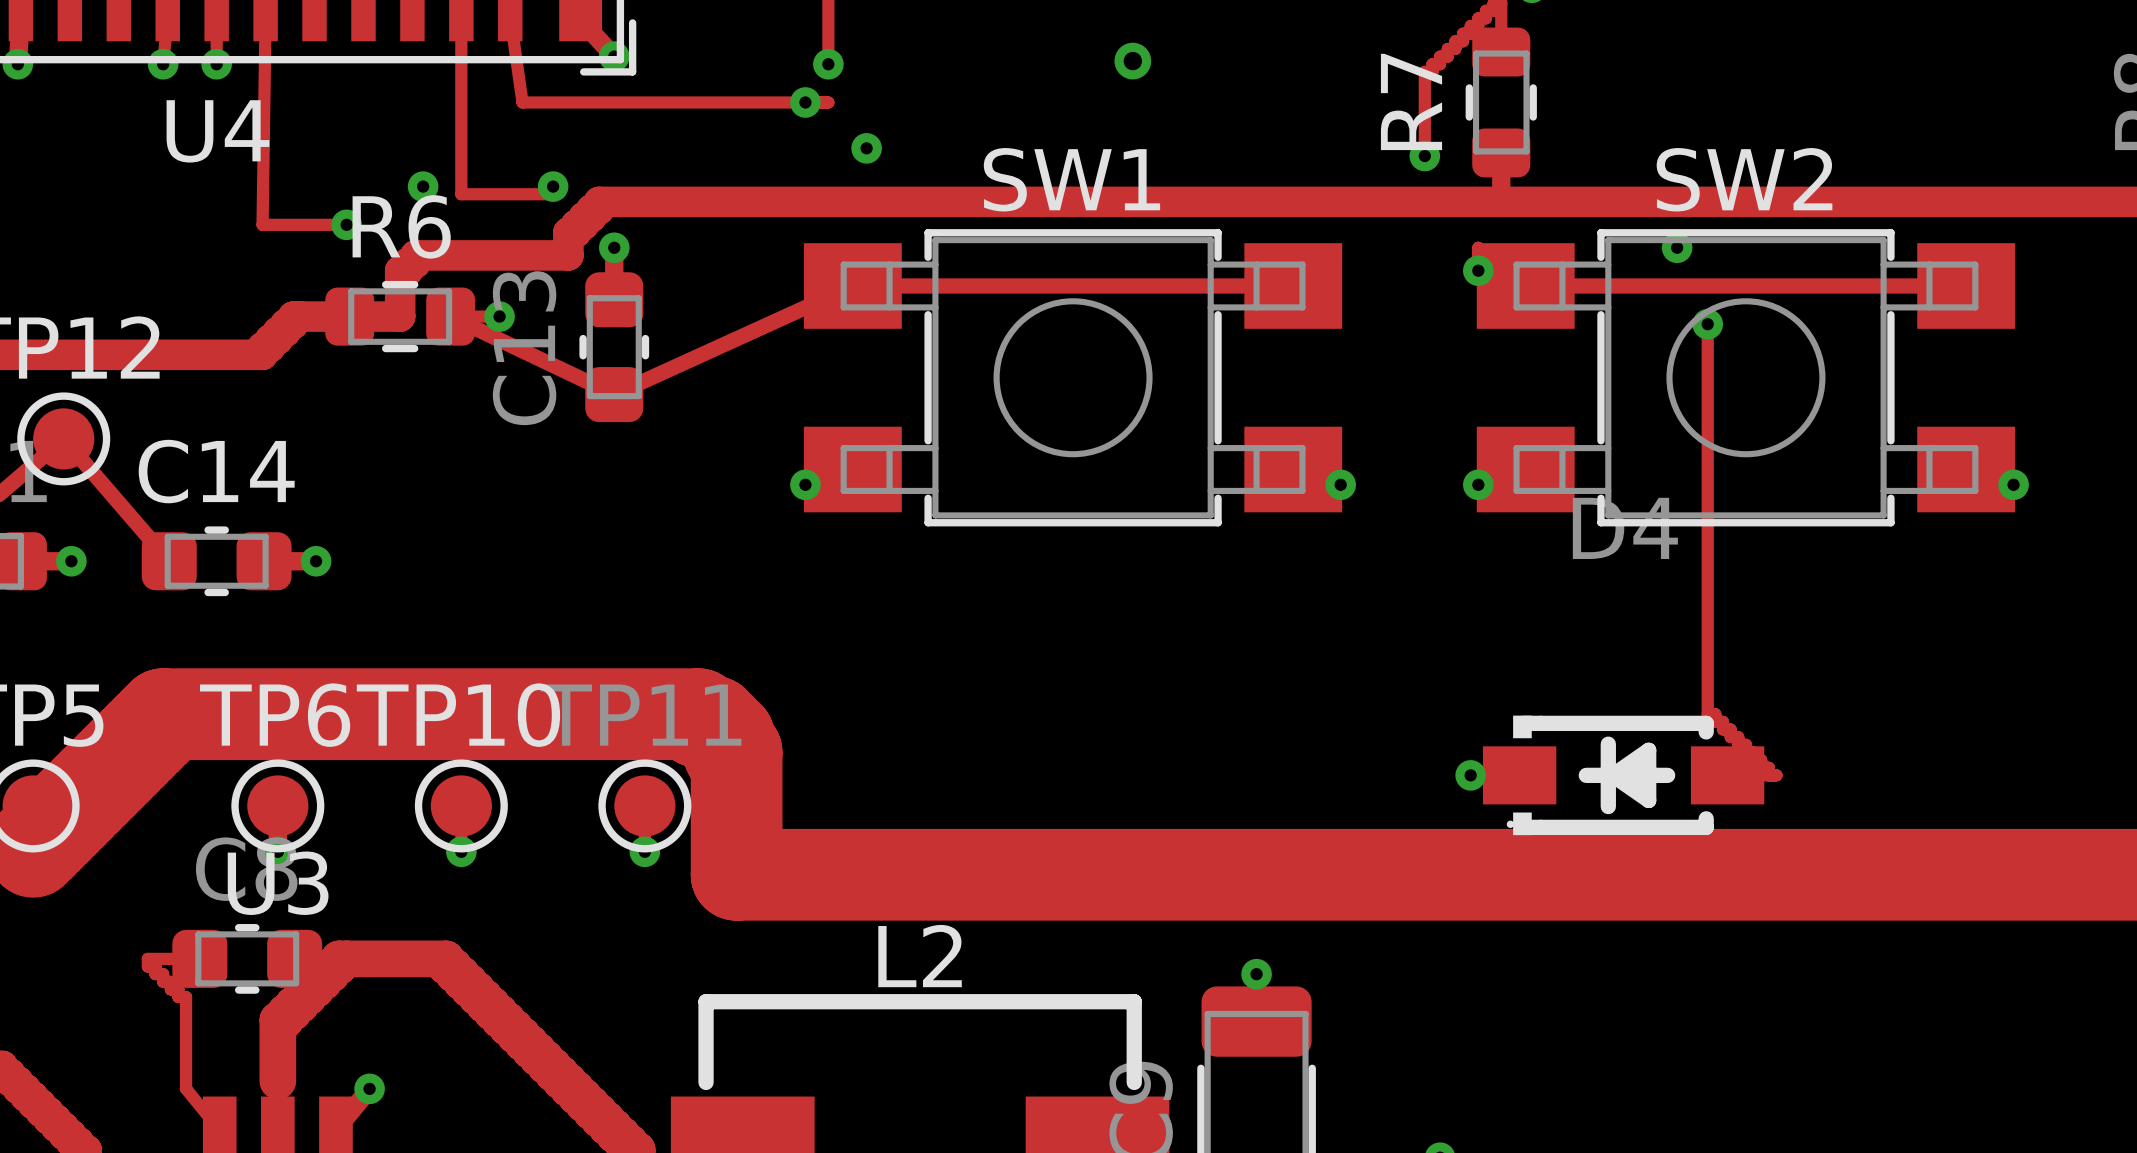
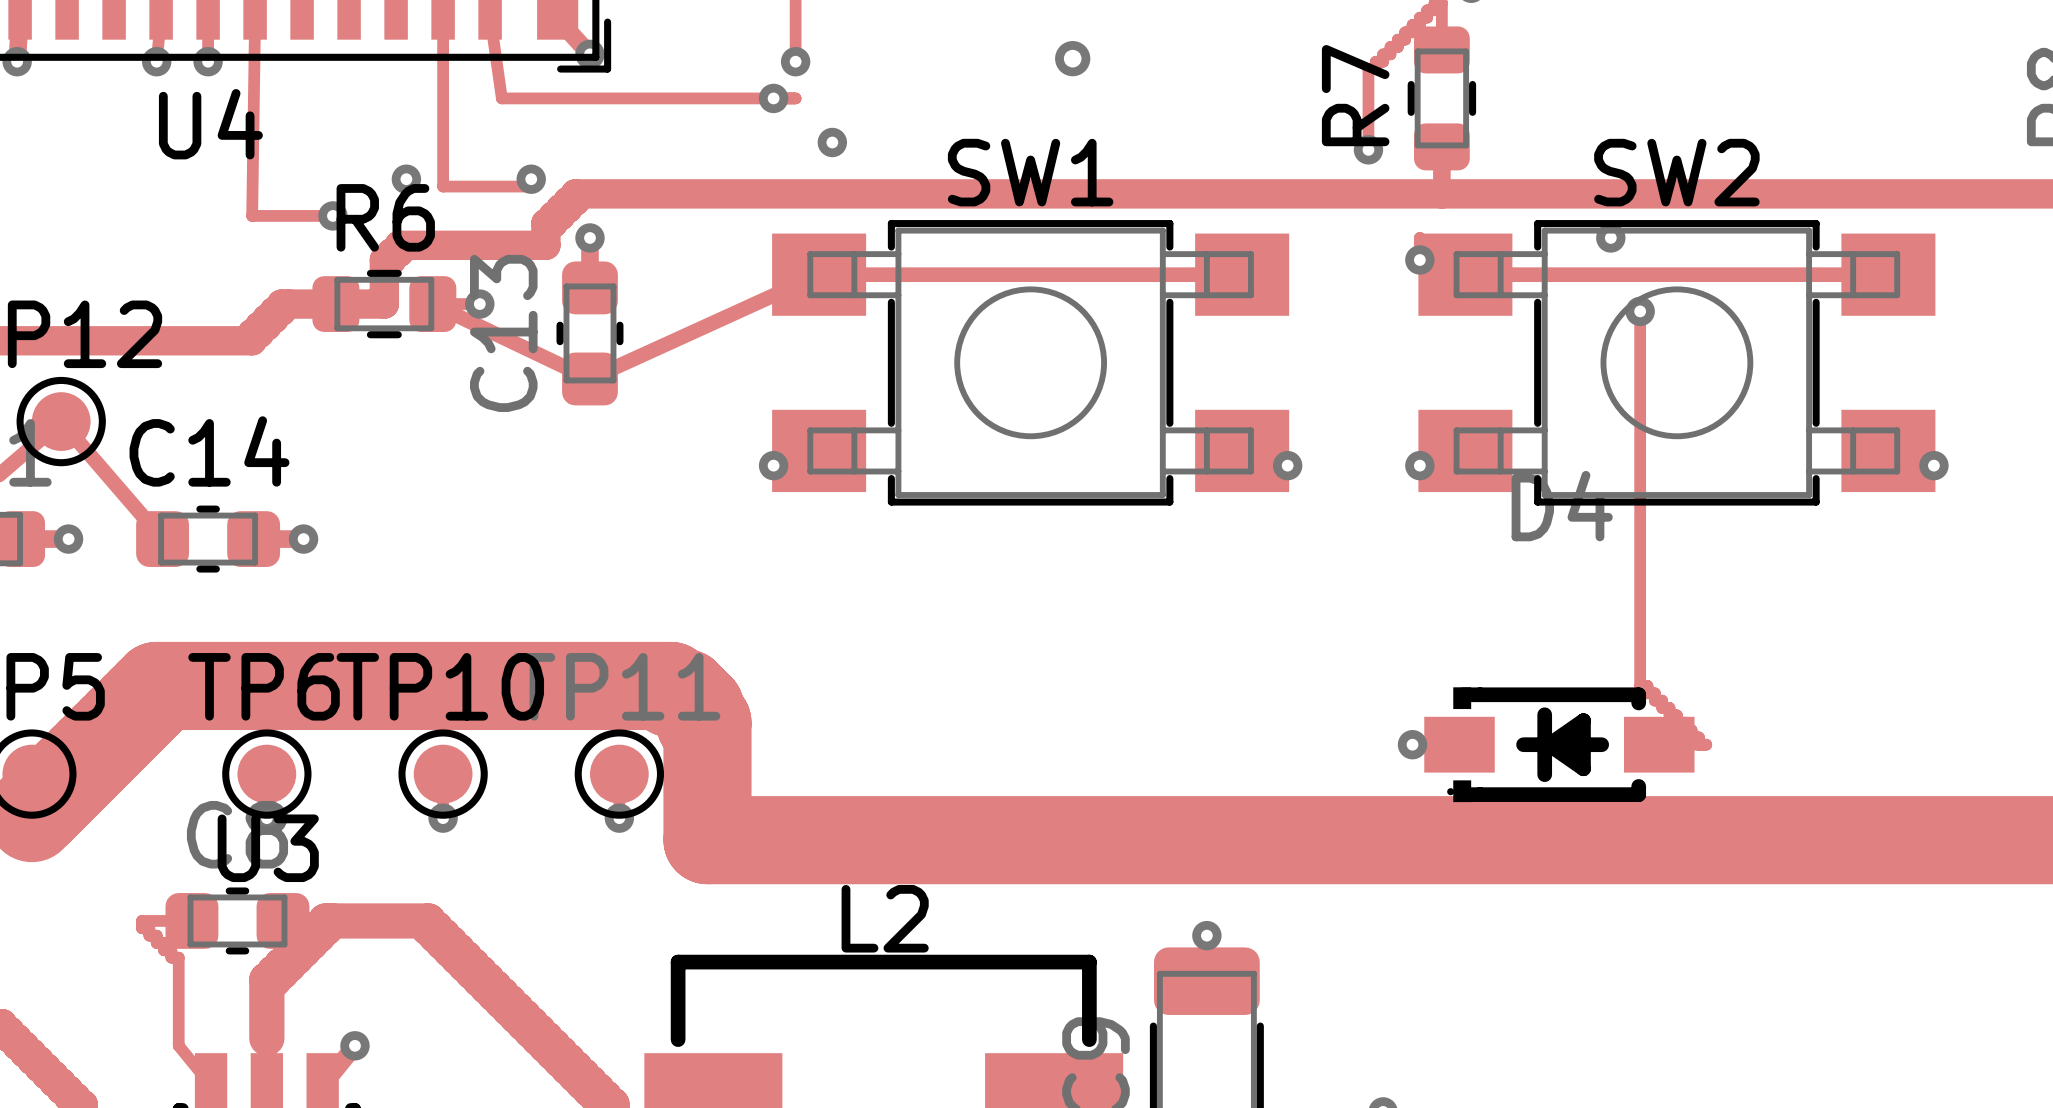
via position: (1132, 61) -> (1072, 58)

